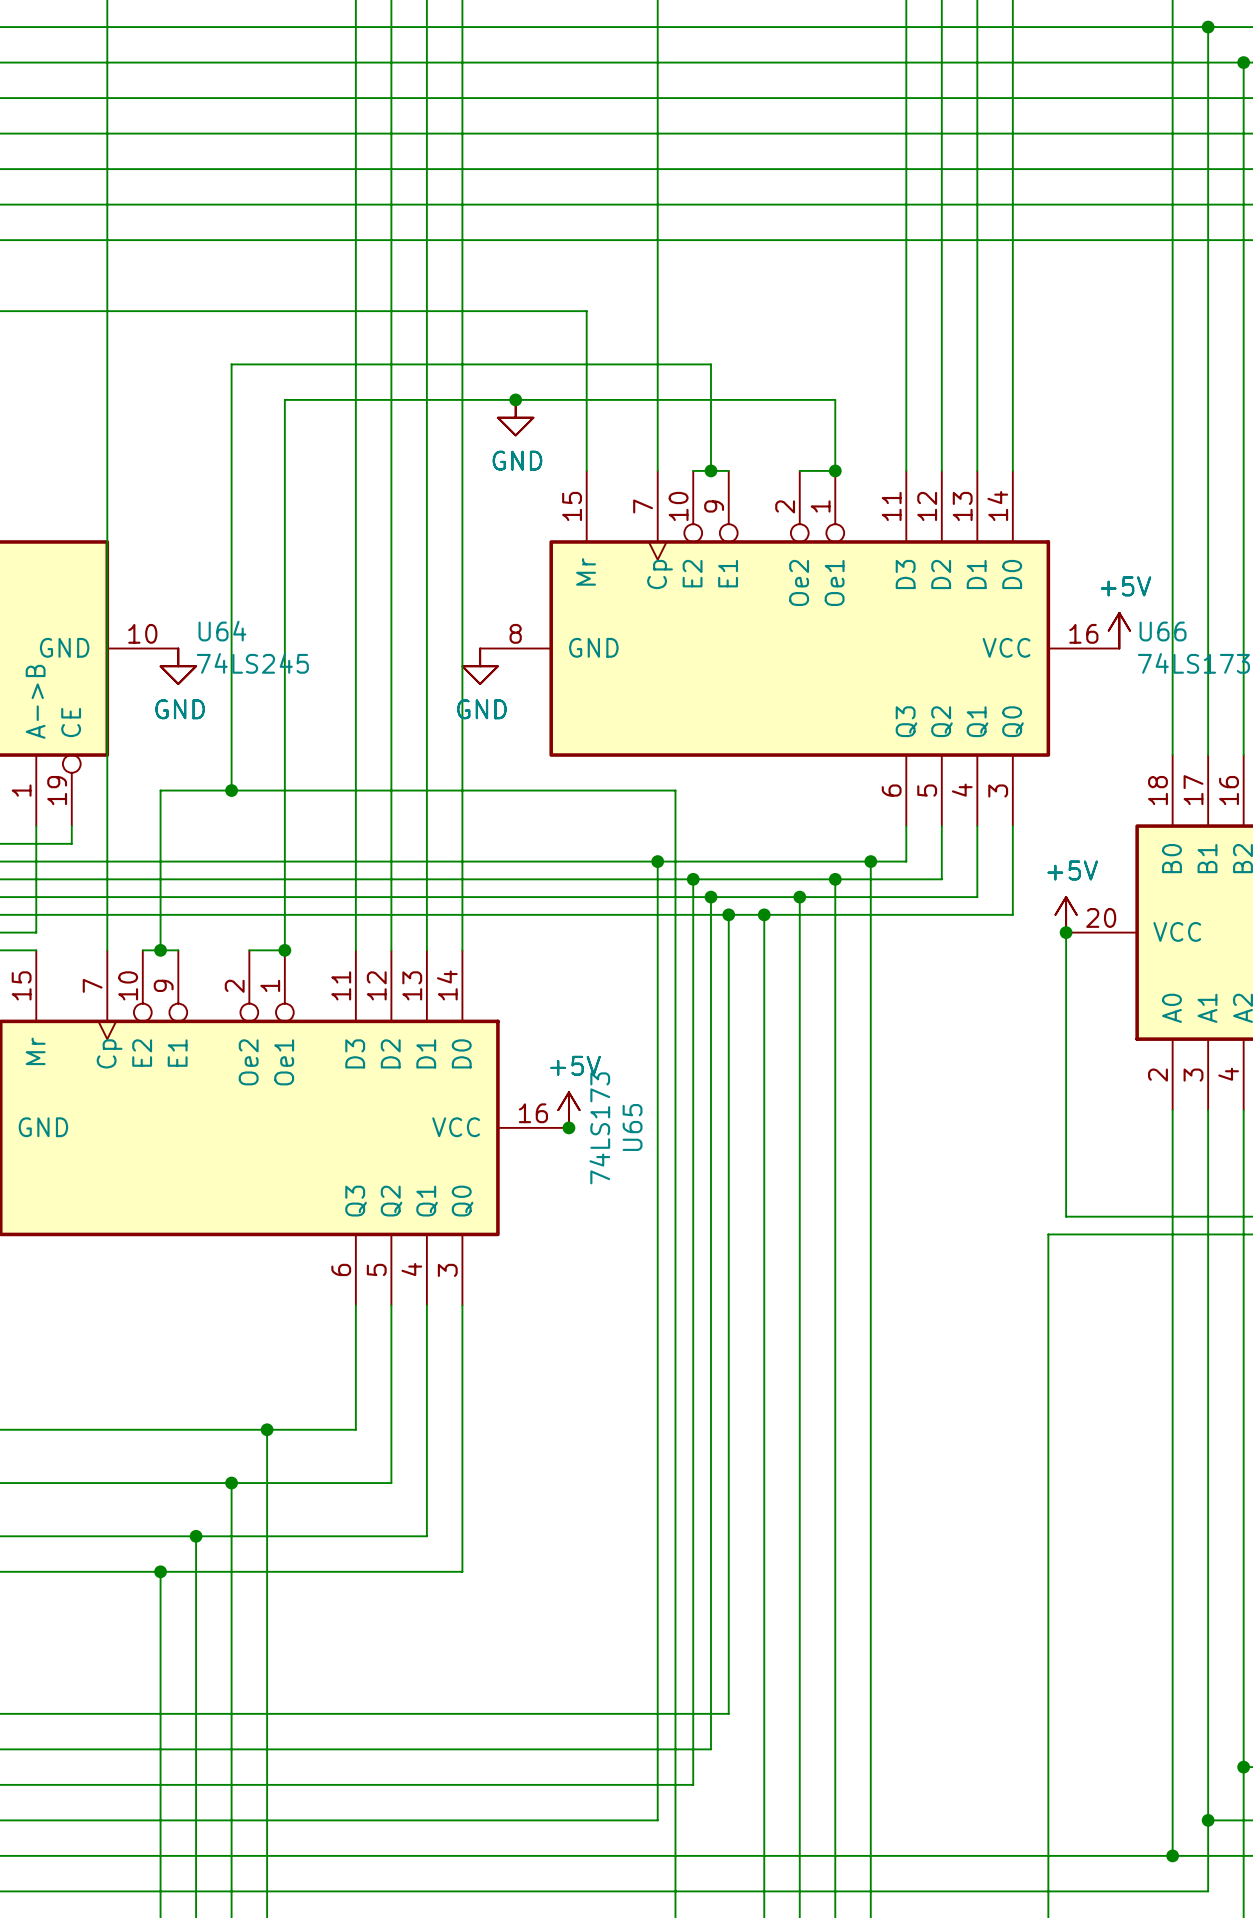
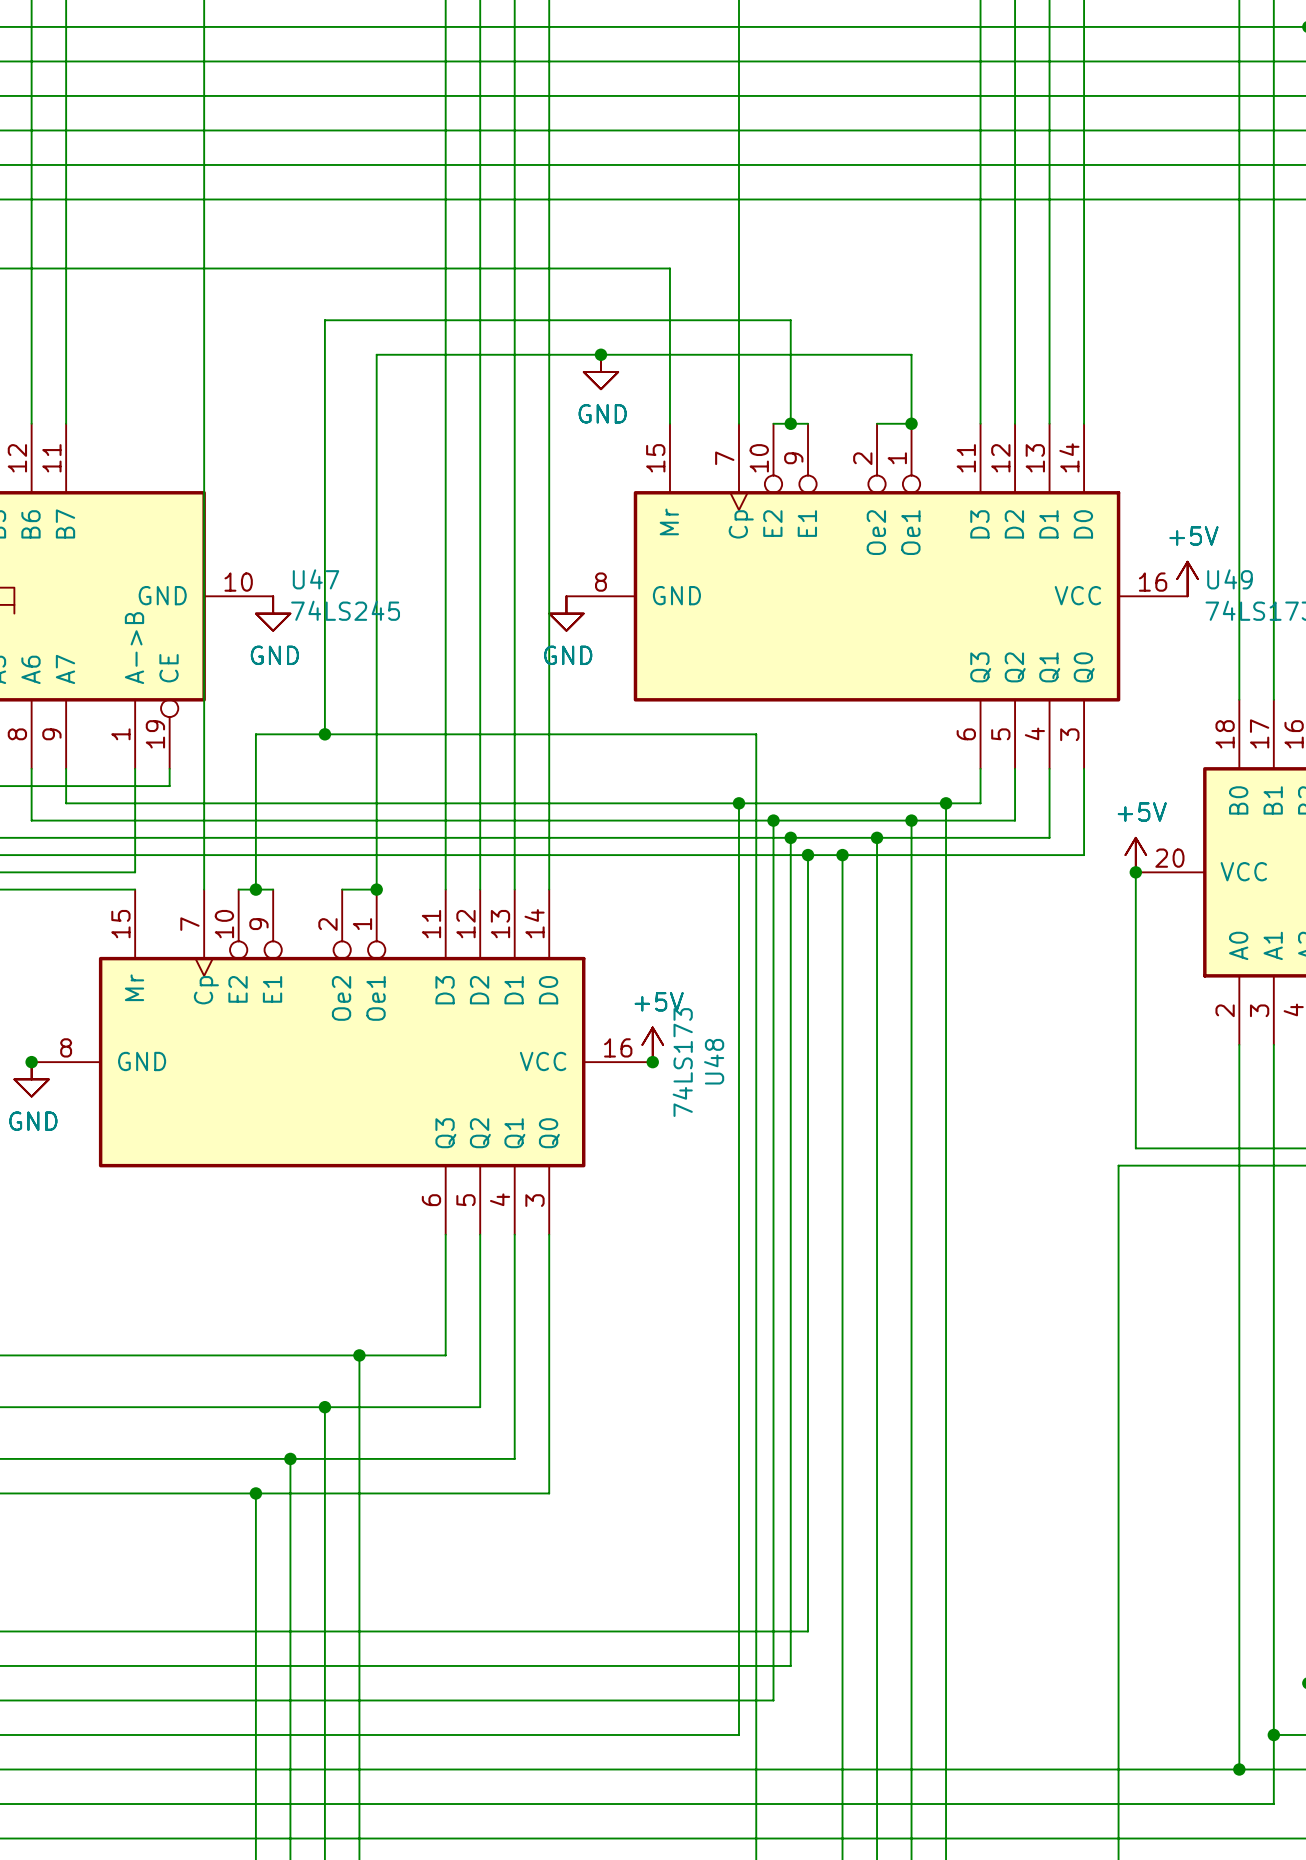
U64 name: U64 (222, 631) -> U47 (316, 579)
U66 name: U66 (1163, 631) -> U49 (1229, 579)
U65 name: U65 (632, 1127) -> U48 (714, 1061)

